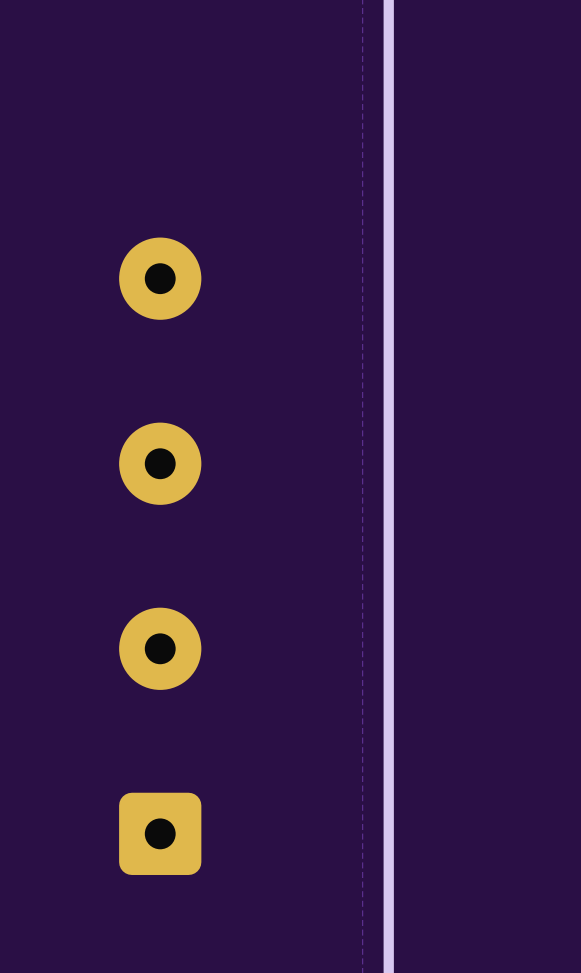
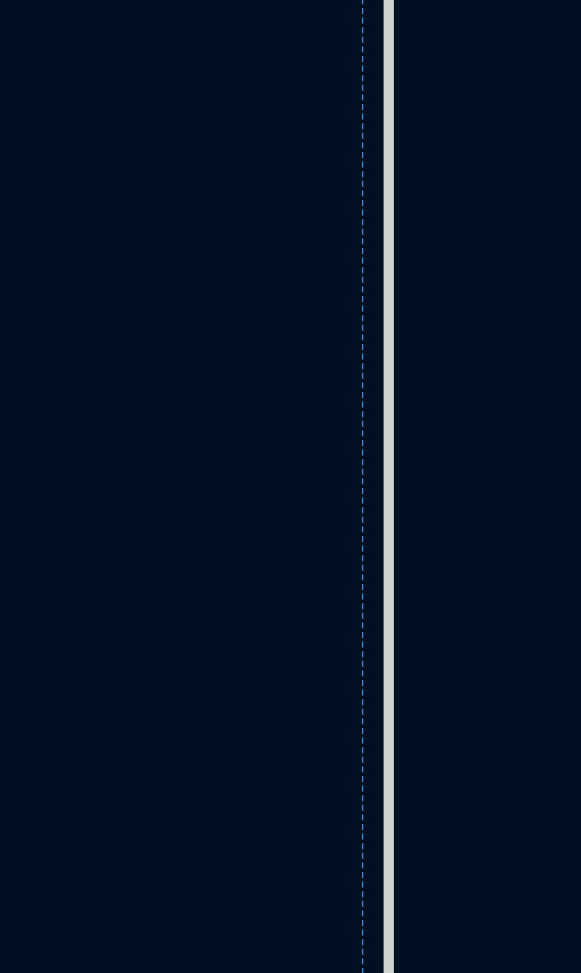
part: (160, 556) -> none

